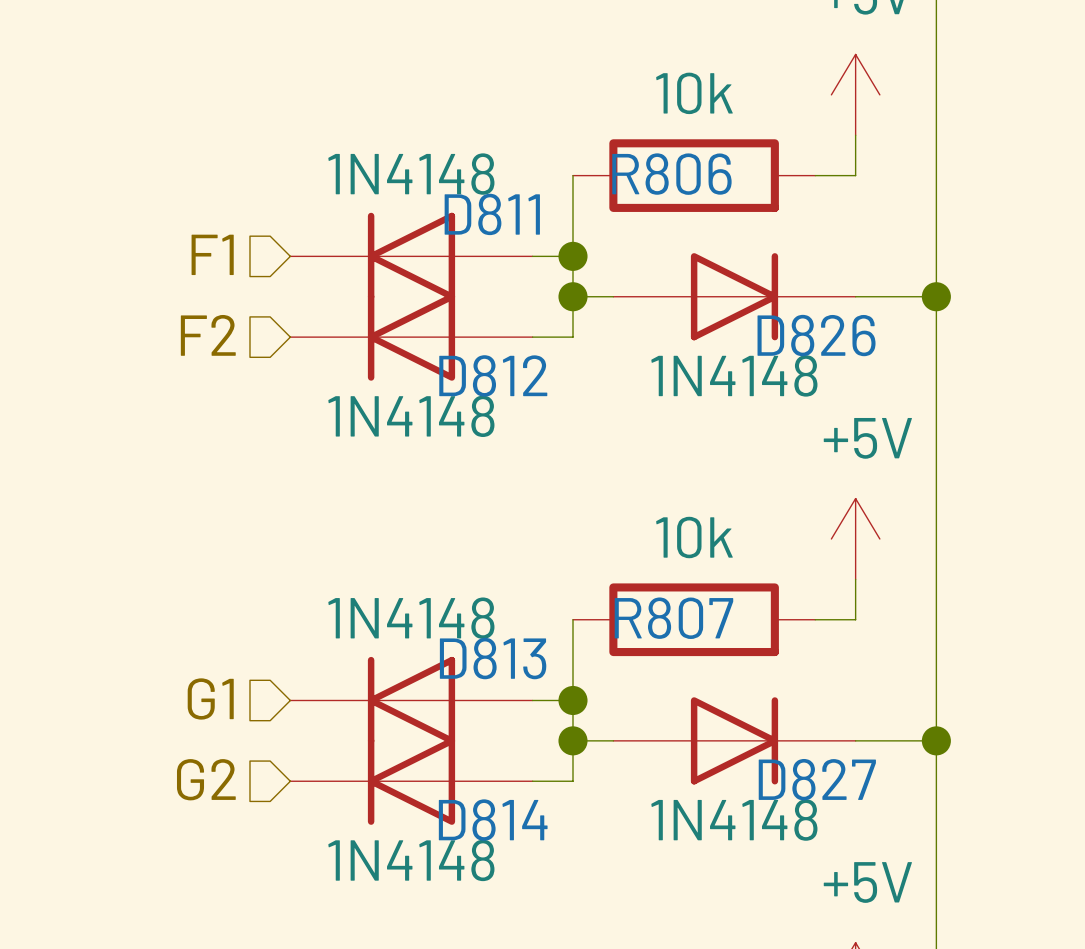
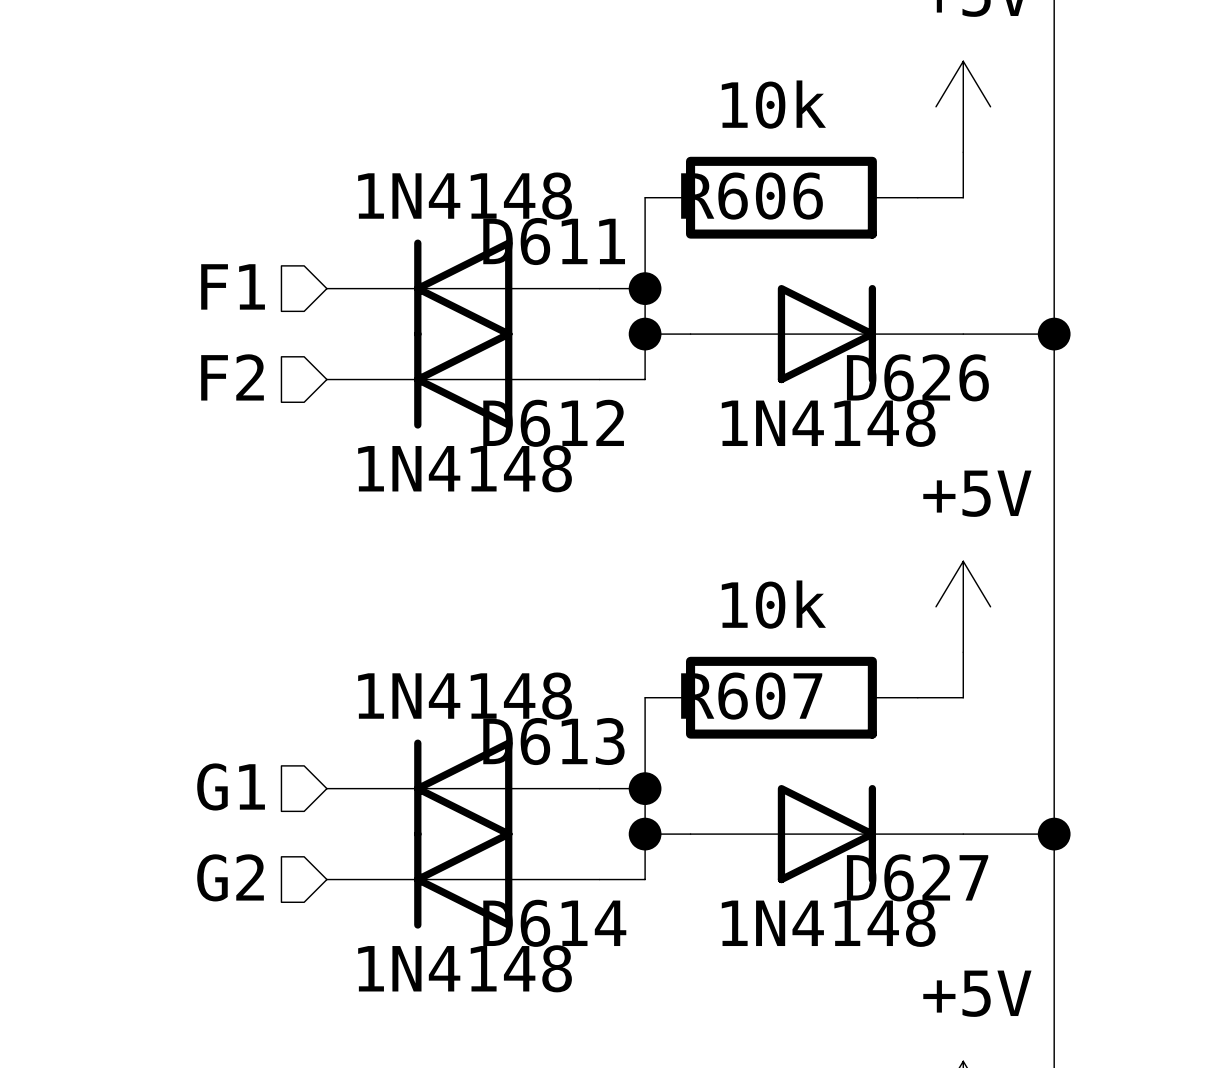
R806 name: R806 (671, 174) -> R606 (751, 196)
D811 name: D811 (492, 214) -> D611 (554, 241)
D826 name: D826 (816, 335) -> D626 (917, 377)
D812 name: D812 (493, 375) -> D612 (553, 423)
R807 name: R807 (673, 618) -> R607 (751, 696)
D813 name: D813 (493, 658) -> D613 (553, 741)
D827 name: D827 (817, 779) -> D627 (917, 877)
D814 name: D814 (493, 820) -> D614 (554, 923)

